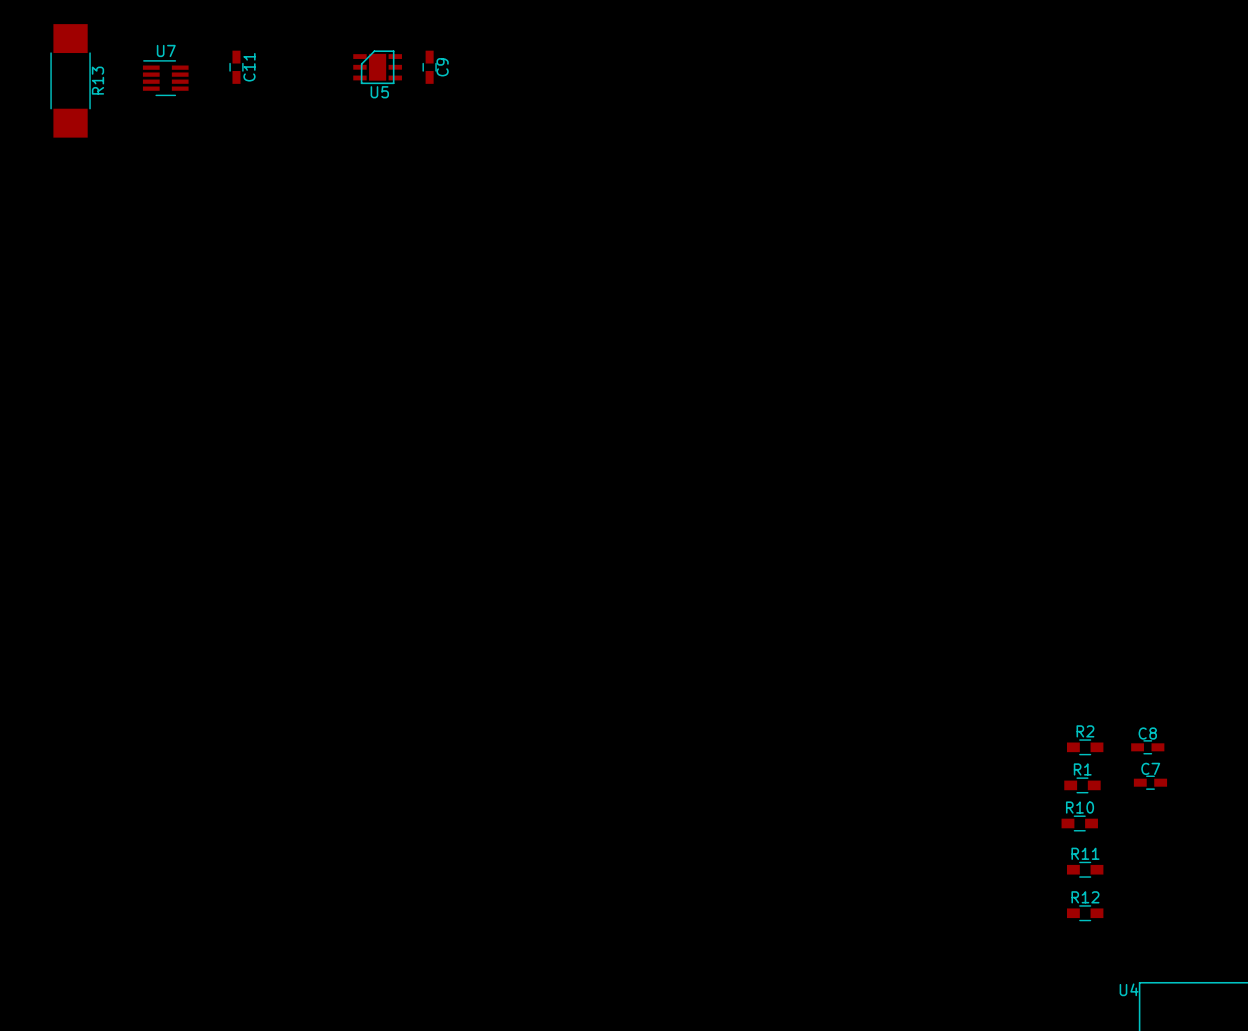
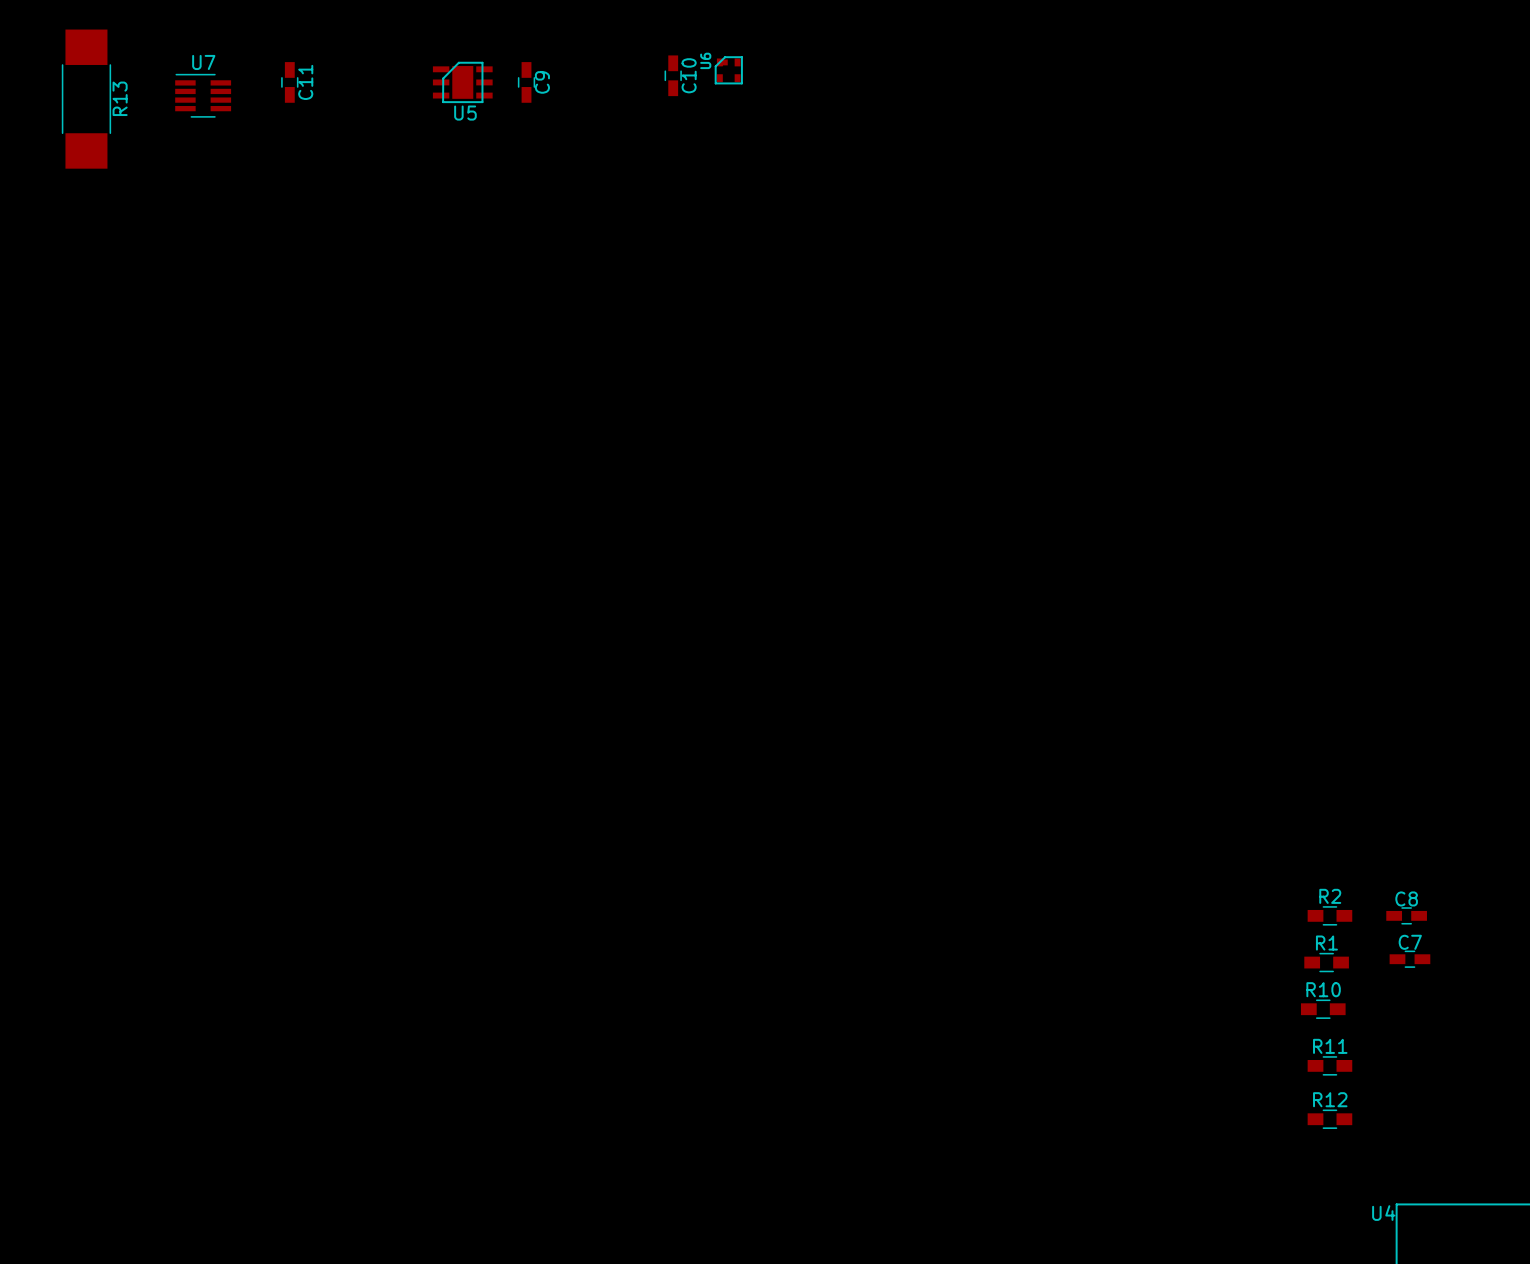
U6: none -> (728, 70)
C10: none -> (673, 75)

